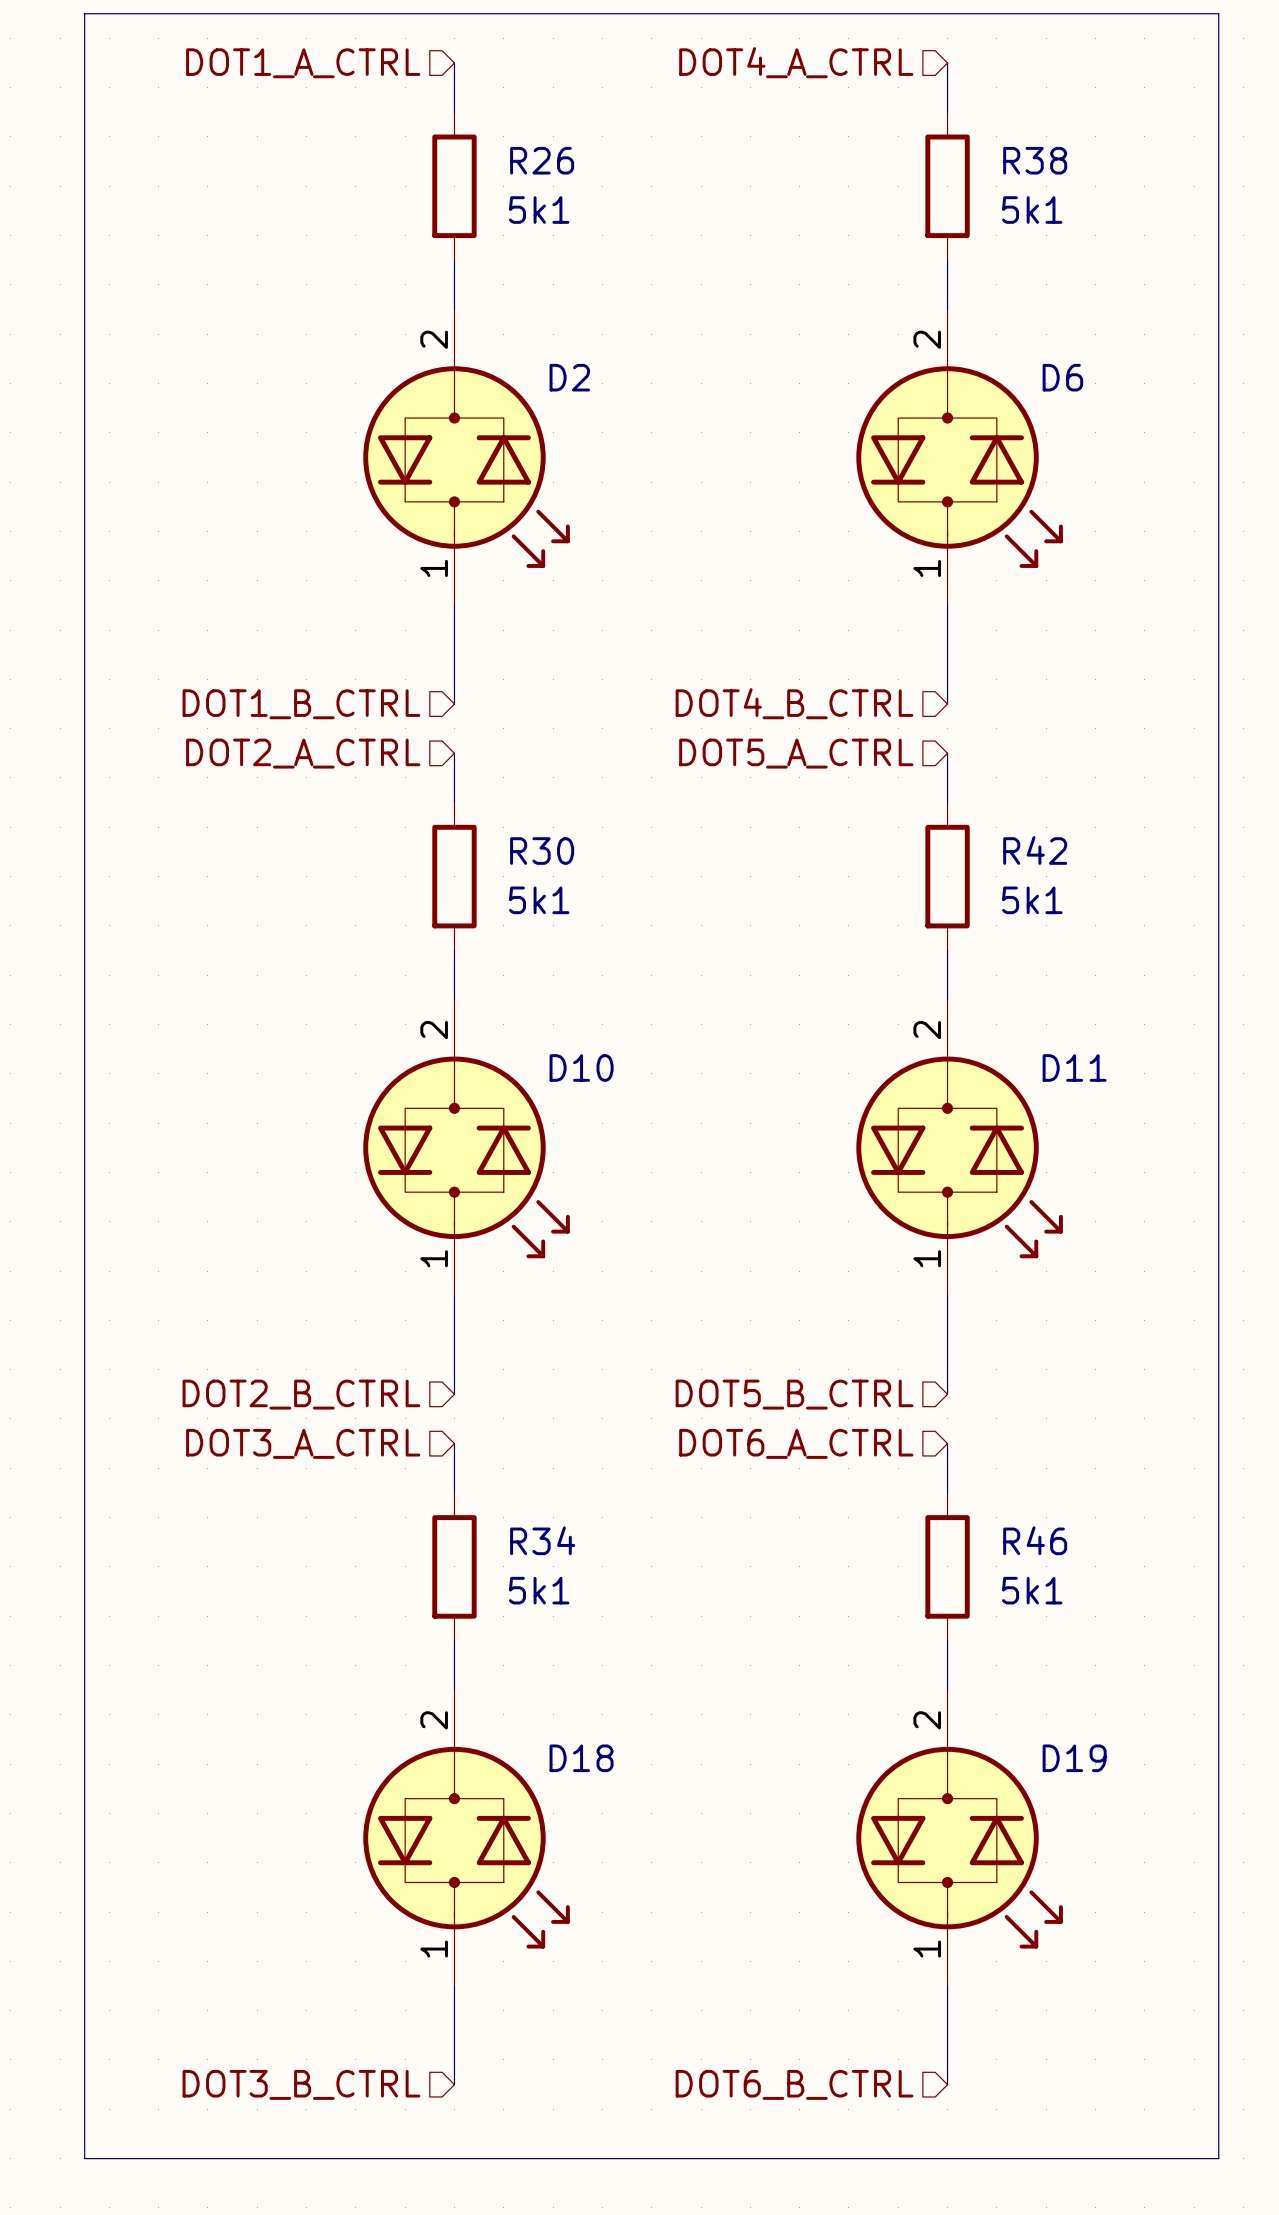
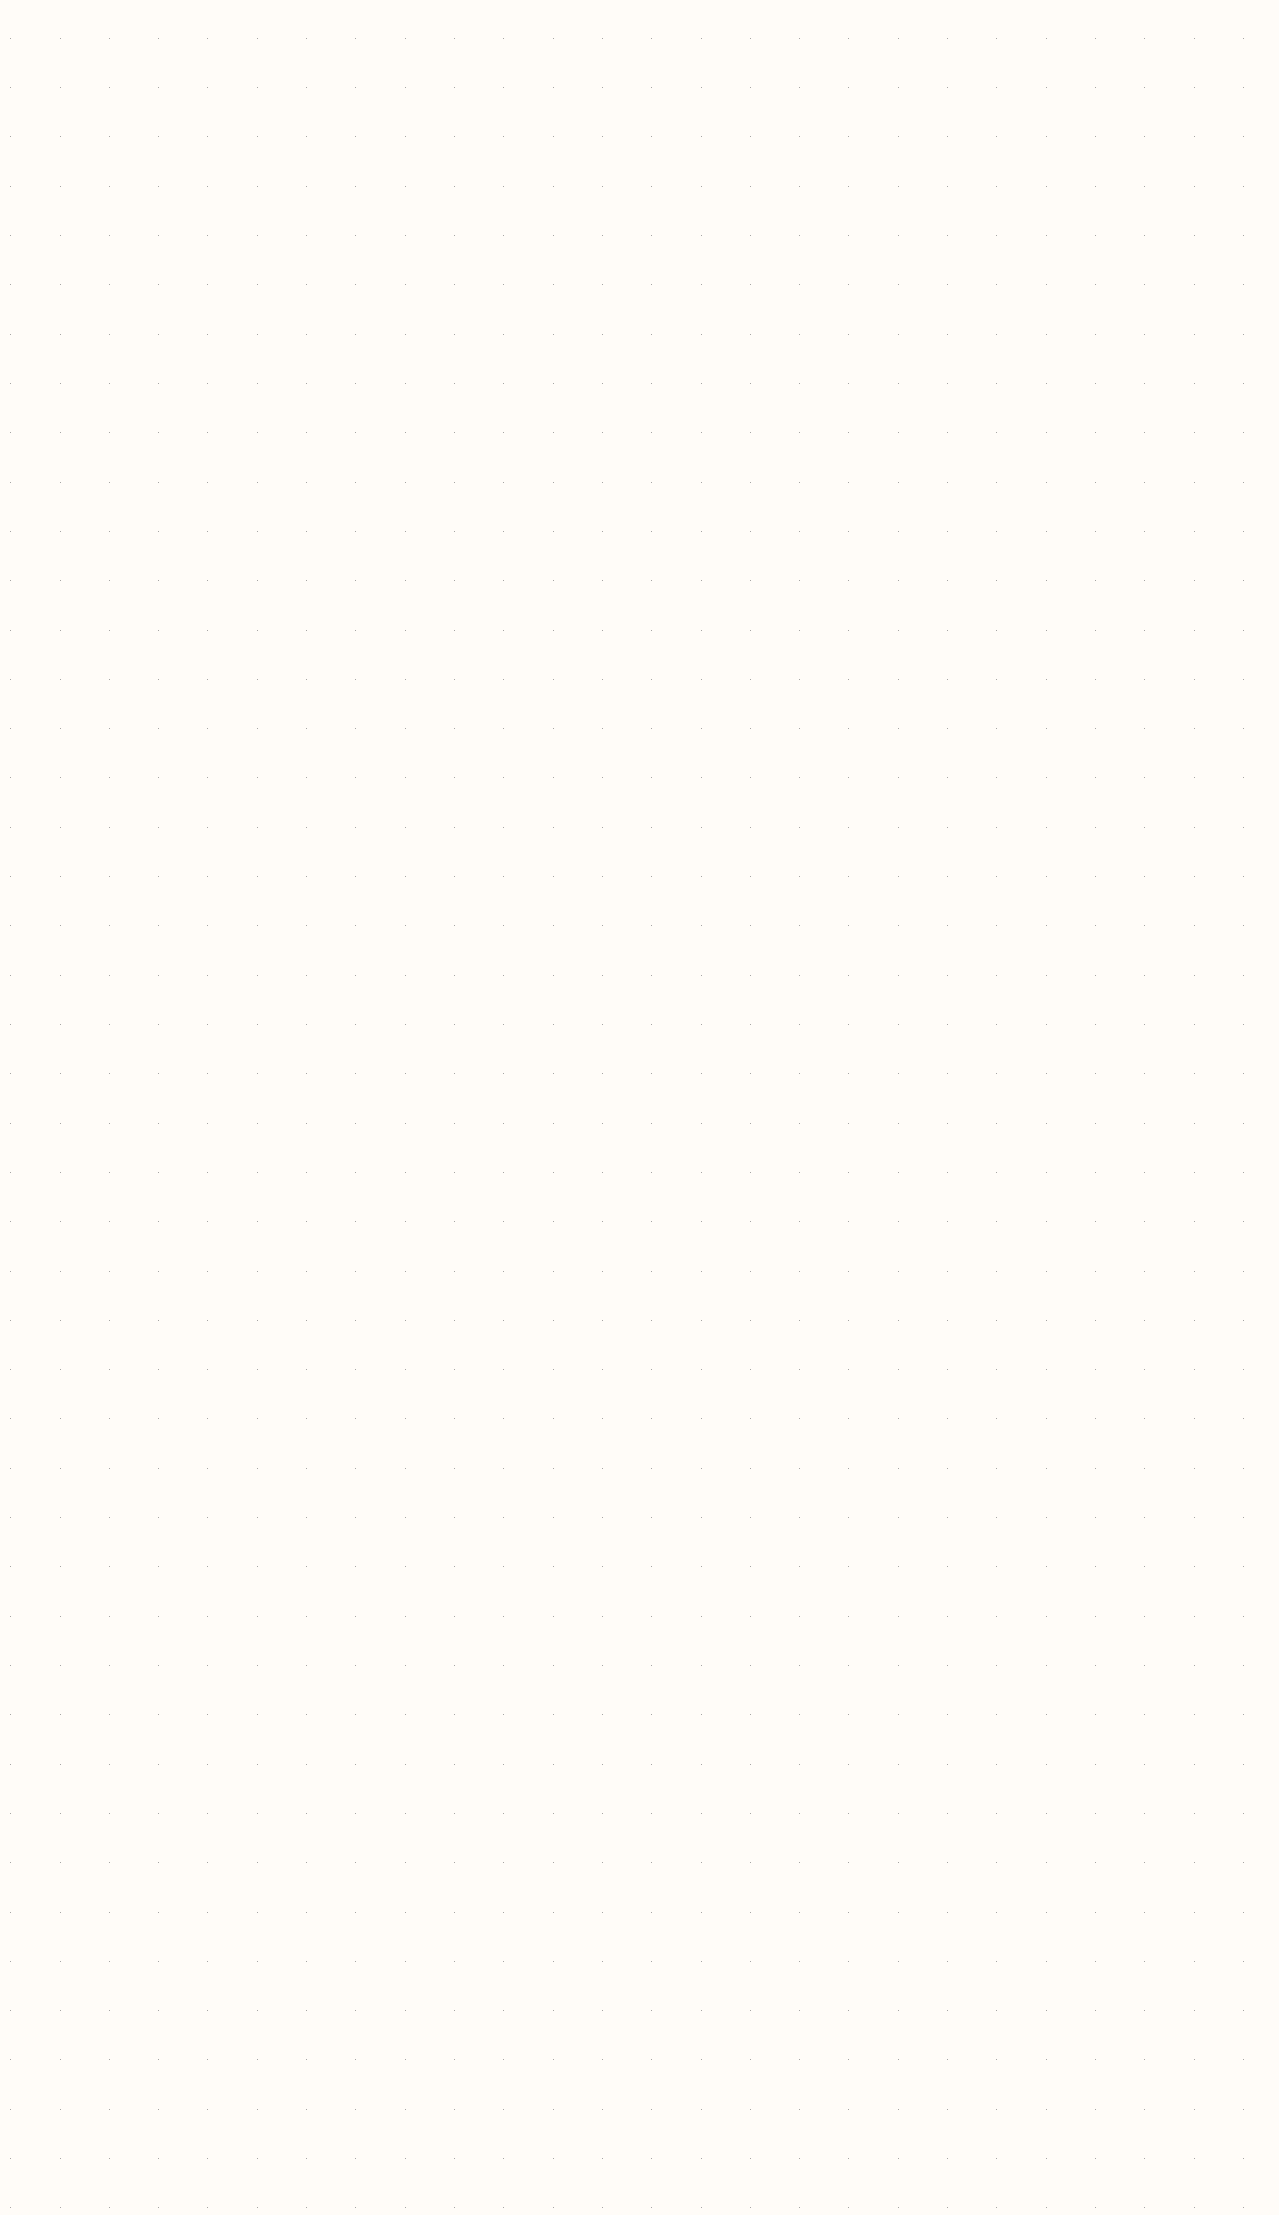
line: (84, 13) (1218, 13) (1218, 2158) (84, 2158) (84, 13) -> none
hierarchical label: DOT4_A_CTRL (796, 62) -> none
hierarchical label: DOT1_A_CTRL (303, 63) -> none
wire: (454, 63) (454, 112) -> none
wire: (947, 63) (947, 112) -> none
R26: 5k1 (454, 186) -> none
R38: 5k1 (947, 186) -> none
wire: (454, 260) (454, 309) -> none
wire: (947, 260) (947, 309) -> none
D2: (466, 457) -> none
D6: (959, 457) -> none
wire: (454, 605) (454, 704) -> none
wire: (947, 605) (947, 704) -> none
hierarchical label: DOT4_B_CTRL (794, 703) -> none
hierarchical label: DOT1_B_CTRL (301, 704) -> none
hierarchical label: DOT2_A_CTRL (303, 753) -> none
wire: (454, 753) (454, 802) -> none
hierarchical label: DOT5_A_CTRL (796, 753) -> none
wire: (947, 753) (947, 802) -> none
R30: 5k1 (454, 876) -> none
R42: 5k1 (947, 876) -> none
wire: (454, 950) (454, 999) -> none
wire: (947, 950) (947, 999) -> none
D10: (466, 1147) -> none
D11: (959, 1147) -> none
wire: (454, 1295) (454, 1394) -> none
wire: (947, 1295) (947, 1394) -> none
hierarchical label: DOT2_B_CTRL (301, 1394) -> none
hierarchical label: DOT5_B_CTRL (794, 1394) -> none
hierarchical label: DOT3_A_CTRL (303, 1443) -> none
wire: (454, 1443) (454, 1492) -> none
hierarchical label: DOT6_A_CTRL (796, 1443) -> none
wire: (947, 1443) (947, 1492) -> none
R34: 5k1 (454, 1566) -> none
R46: 5k1 (947, 1566) -> none
wire: (454, 1640) (454, 1690) -> none
wire: (947, 1640) (947, 1690) -> none
D18: (466, 1838) -> none
D19: (959, 1838) -> none
wire: (454, 1986) (454, 2084) -> none
wire: (947, 1986) (947, 2084) -> none
hierarchical label: DOT3_B_CTRL (301, 2084) -> none
hierarchical label: DOT6_B_CTRL (794, 2084) -> none

